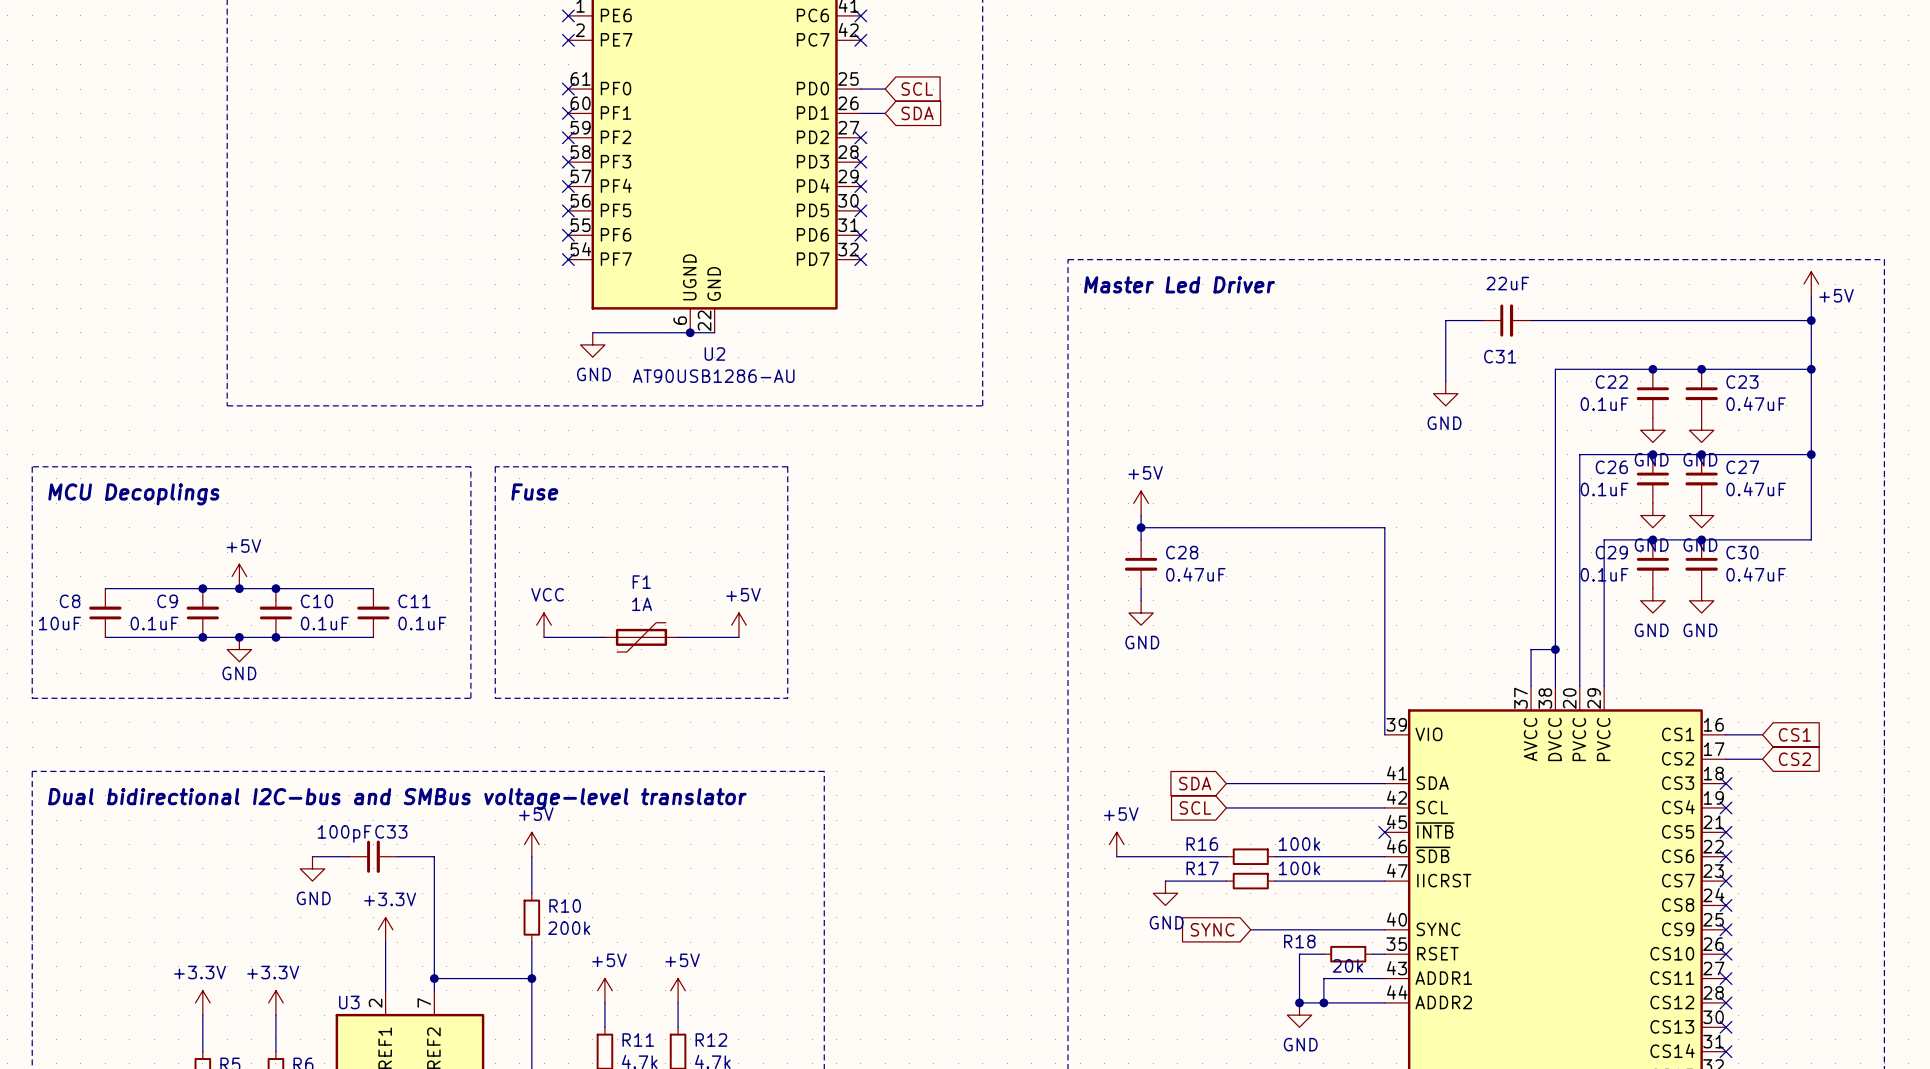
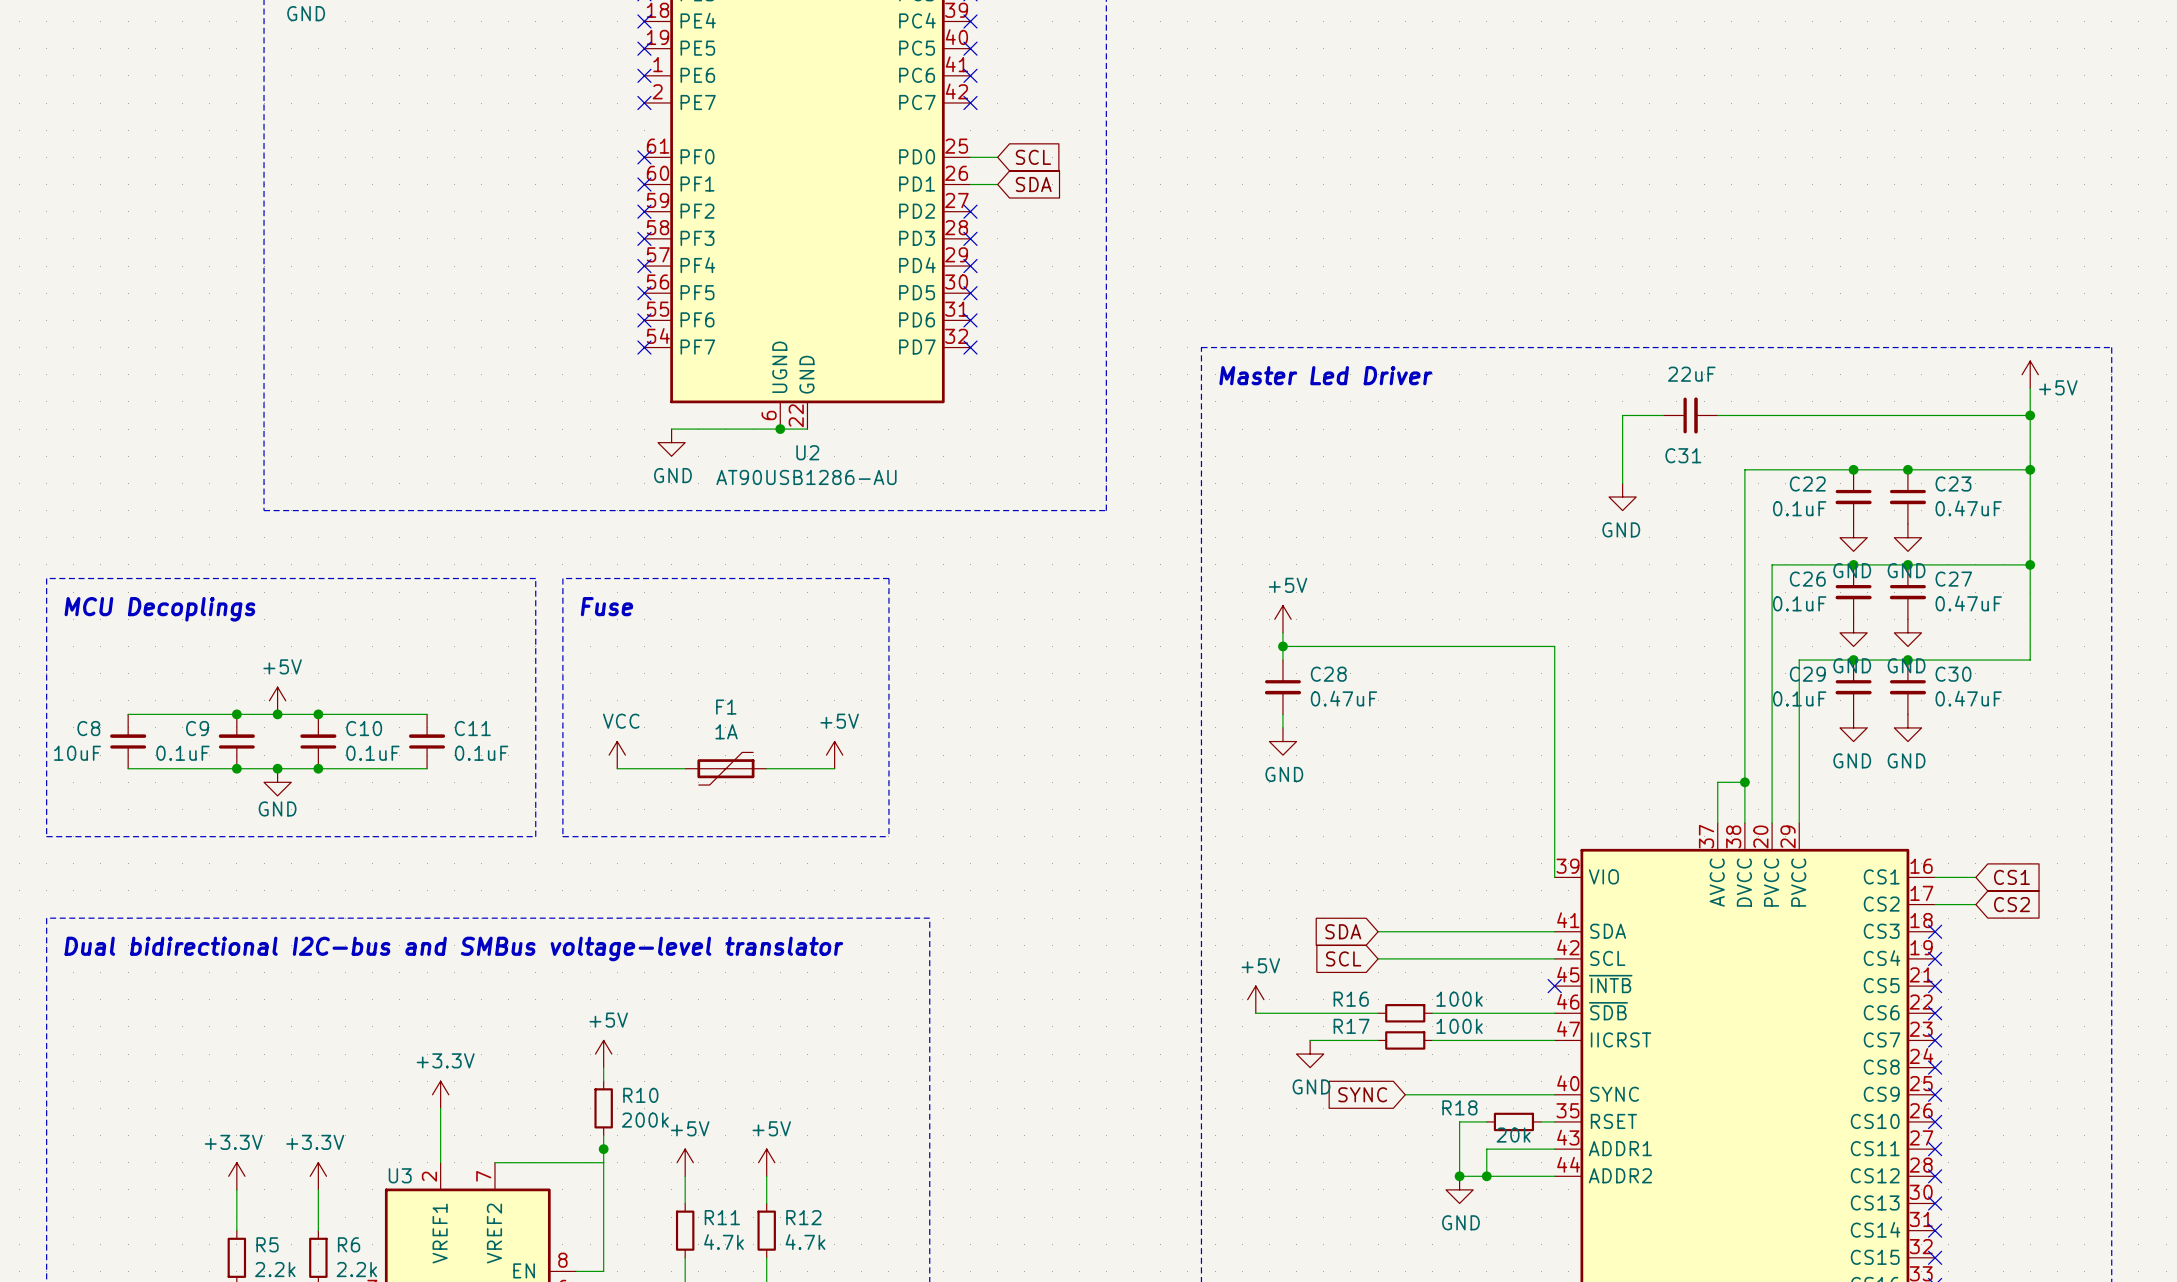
power symbol position: +5V (531, 844) -> +5V (603, 1054)
wire: (312, 856) (349, 856) -> none
C33: 100pF (373, 856) -> none
wire: (397, 856) (434, 856) (434, 990) -> (603, 1162) (494, 1162)
wire: (531, 856) (531, 893) -> none
power symbol: GND (312, 868) -> none
wire: none -> (603, 1067) (603, 1081)
R10 position: (531, 917) -> (603, 1108)
wire: (531, 942) (531, 966) -> none
wire: (434, 978) (531, 978) -> none
junction: (434, 978) -> none

